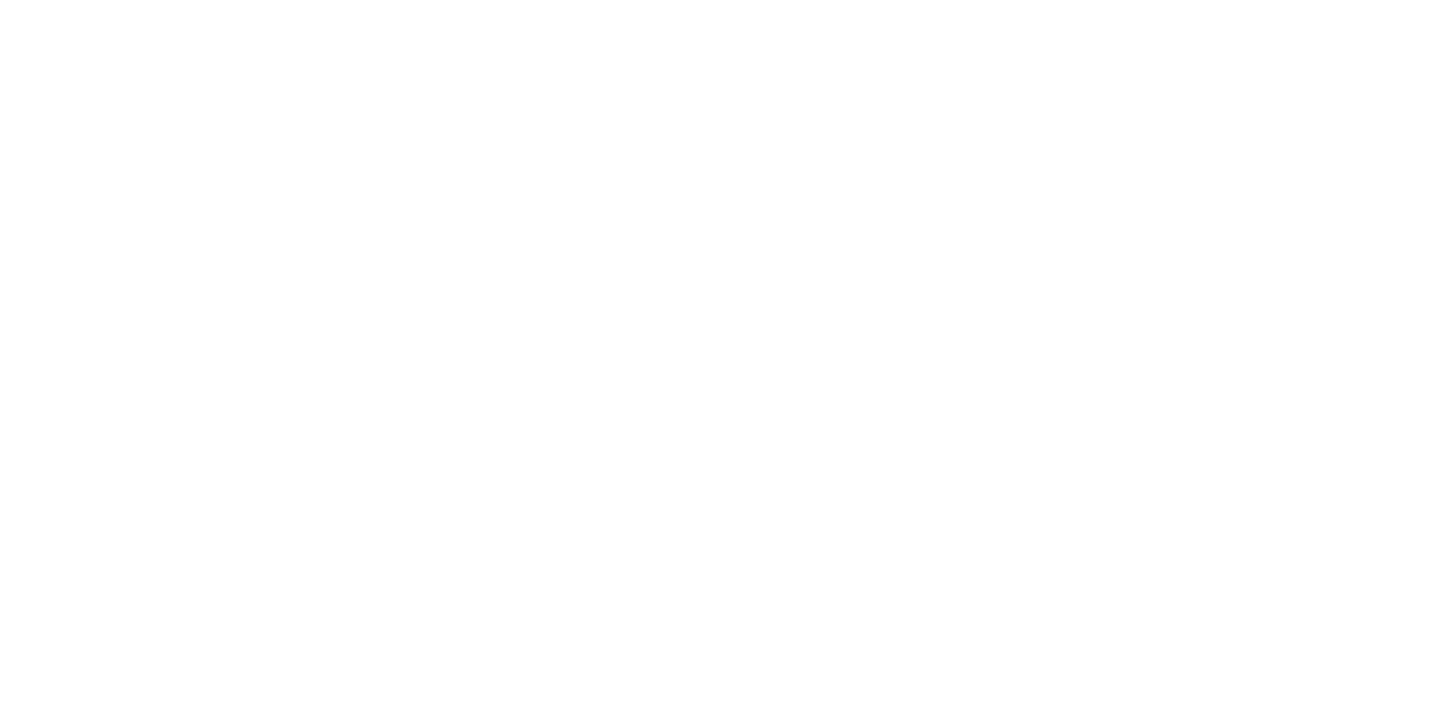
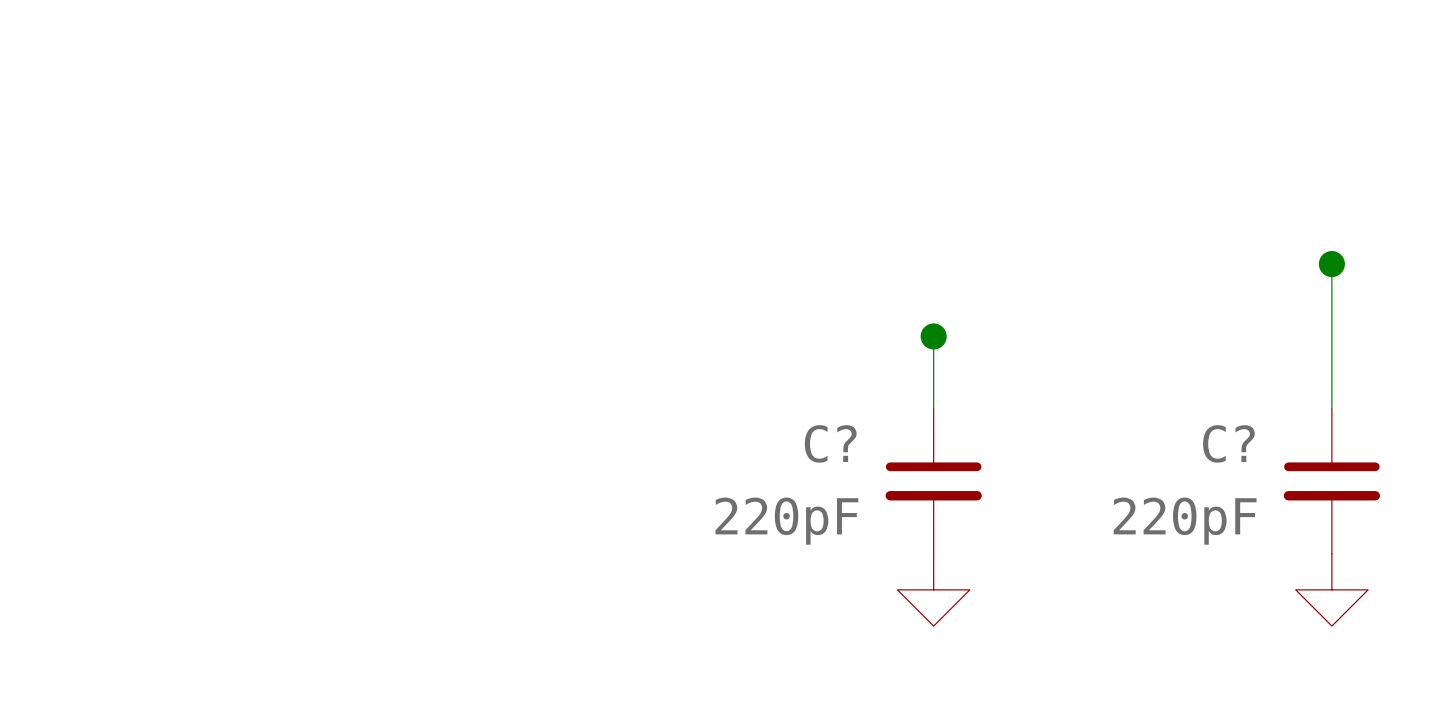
wire: none -> (1331, 264) (1331, 408)
junction: none -> (1331, 264)
wire: none -> (933, 336) (933, 408)
junction: none -> (933, 336)
C?: none -> 220pF (933, 481)
C?: none -> 220pF (1331, 481)
power symbol: none -> (933, 589)
power symbol: none -> (1331, 589)

